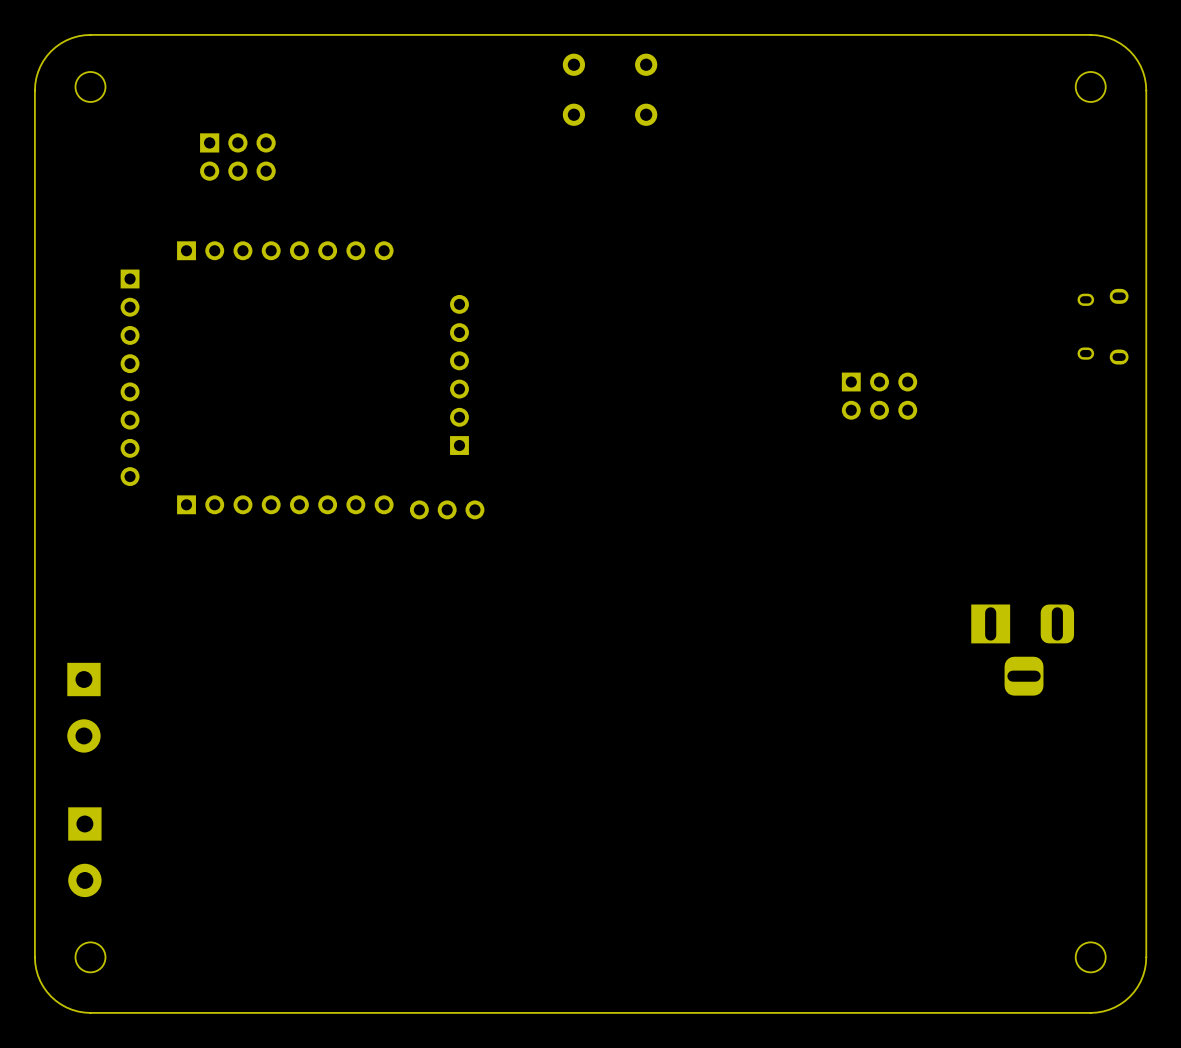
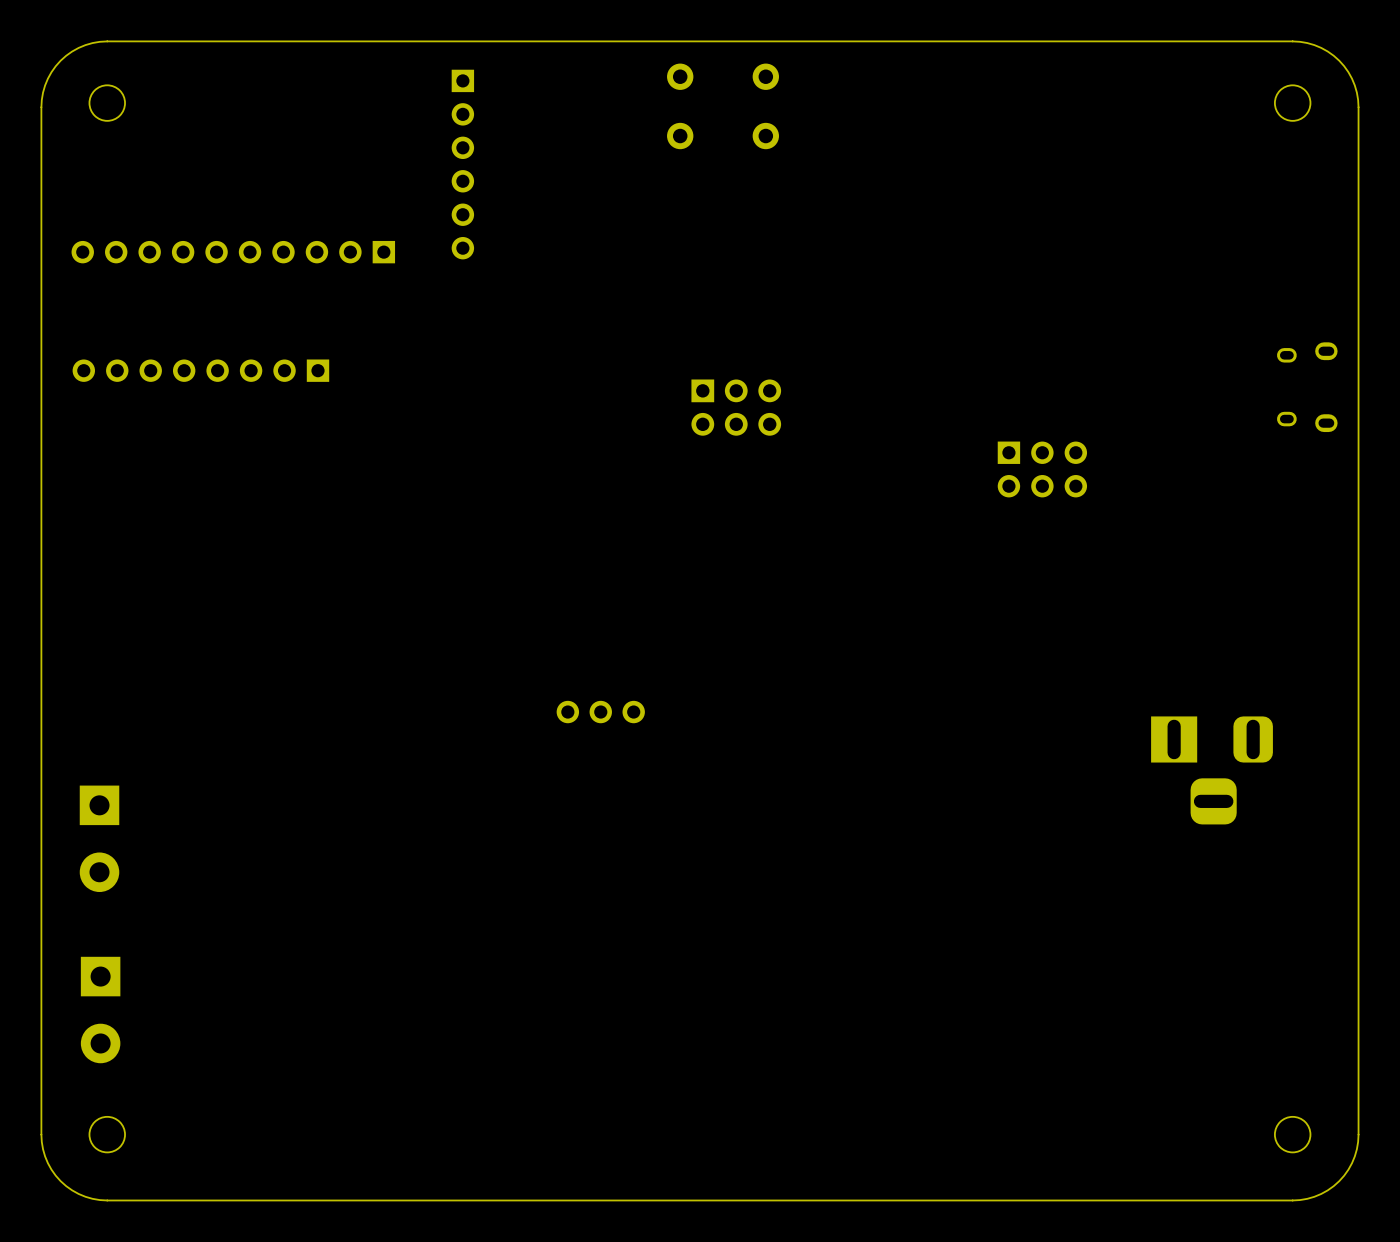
part: (237, 157) -> none
part: none -> (233, 252)
part: (285, 250) -> none
part: none -> (200, 370)
part: none -> (736, 407)
part rotation: 0° (459, 374) -> 180° (462, 164)
part position: (459, 374) -> (462, 164)
part: (130, 377) -> none
part: (285, 504) -> none
part position: (447, 509) -> (600, 712)

